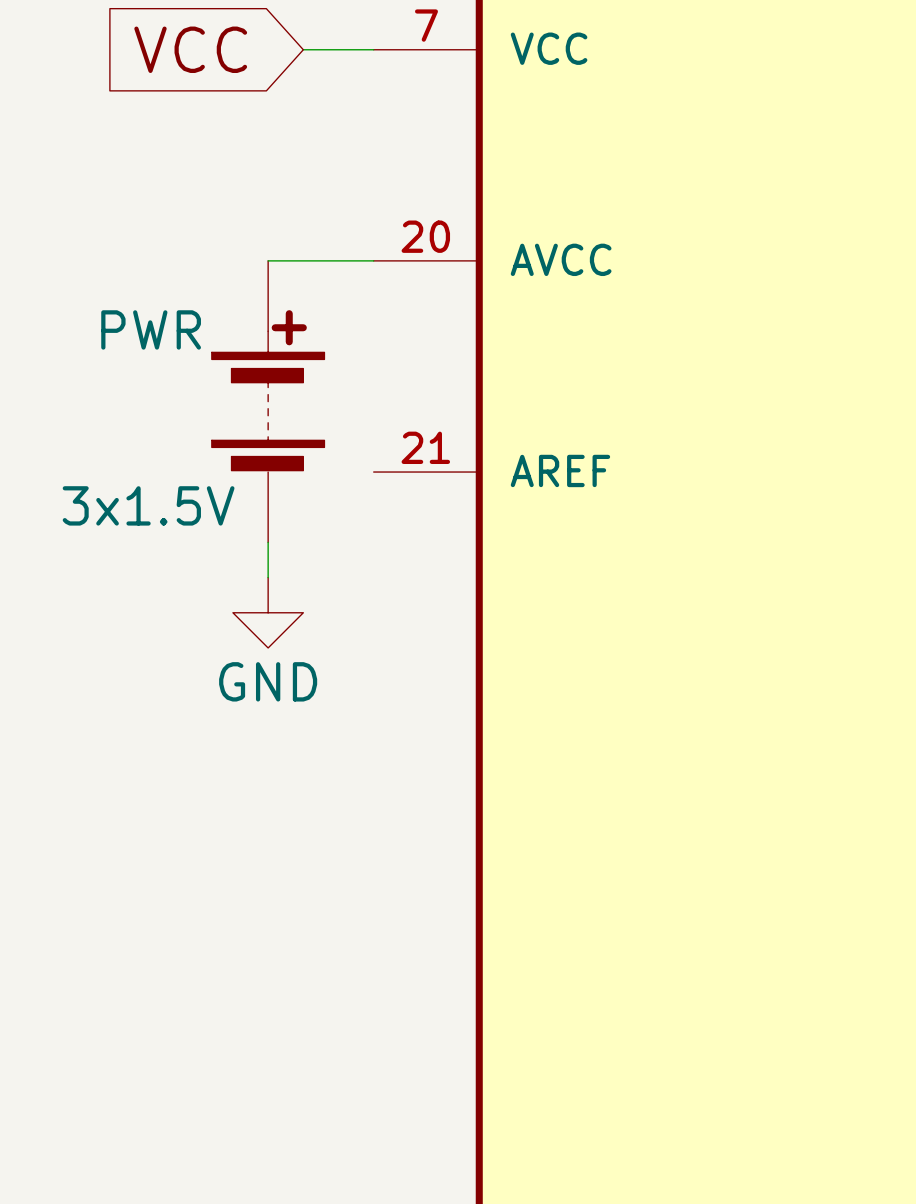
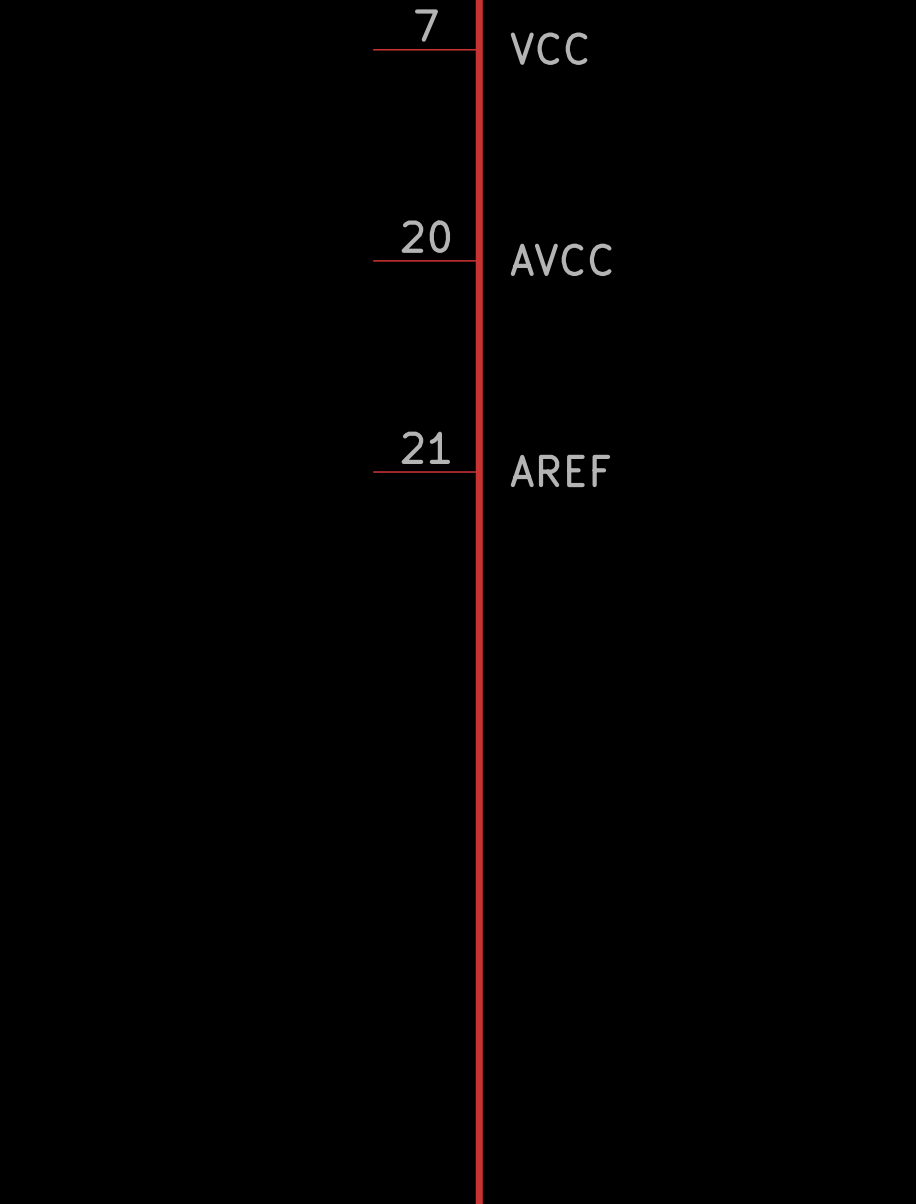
global label: VCC (190, 49) -> none
wire: (303, 49) (373, 49) -> none
wire: (268, 260) (373, 260) -> none
PWR: 3x1.5V (268, 401) -> none
wire: (268, 542) (268, 577) -> none
power symbol: GND (268, 612) -> none

